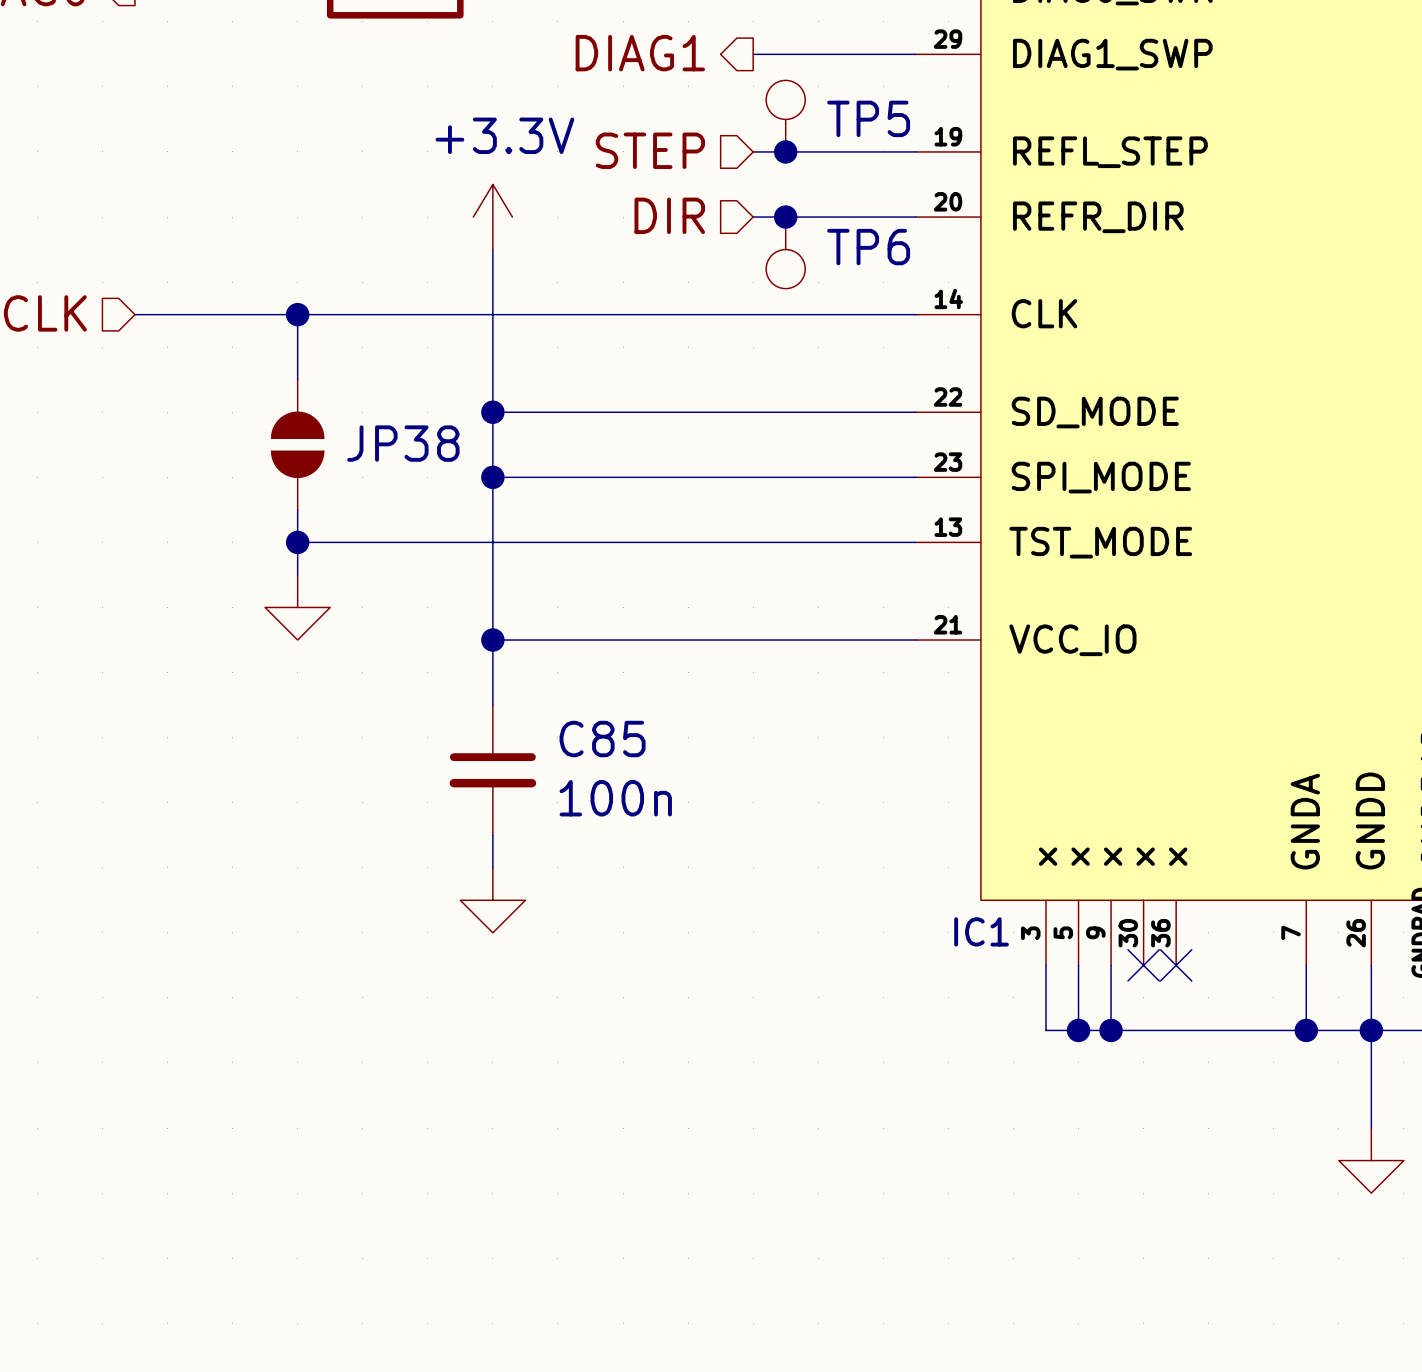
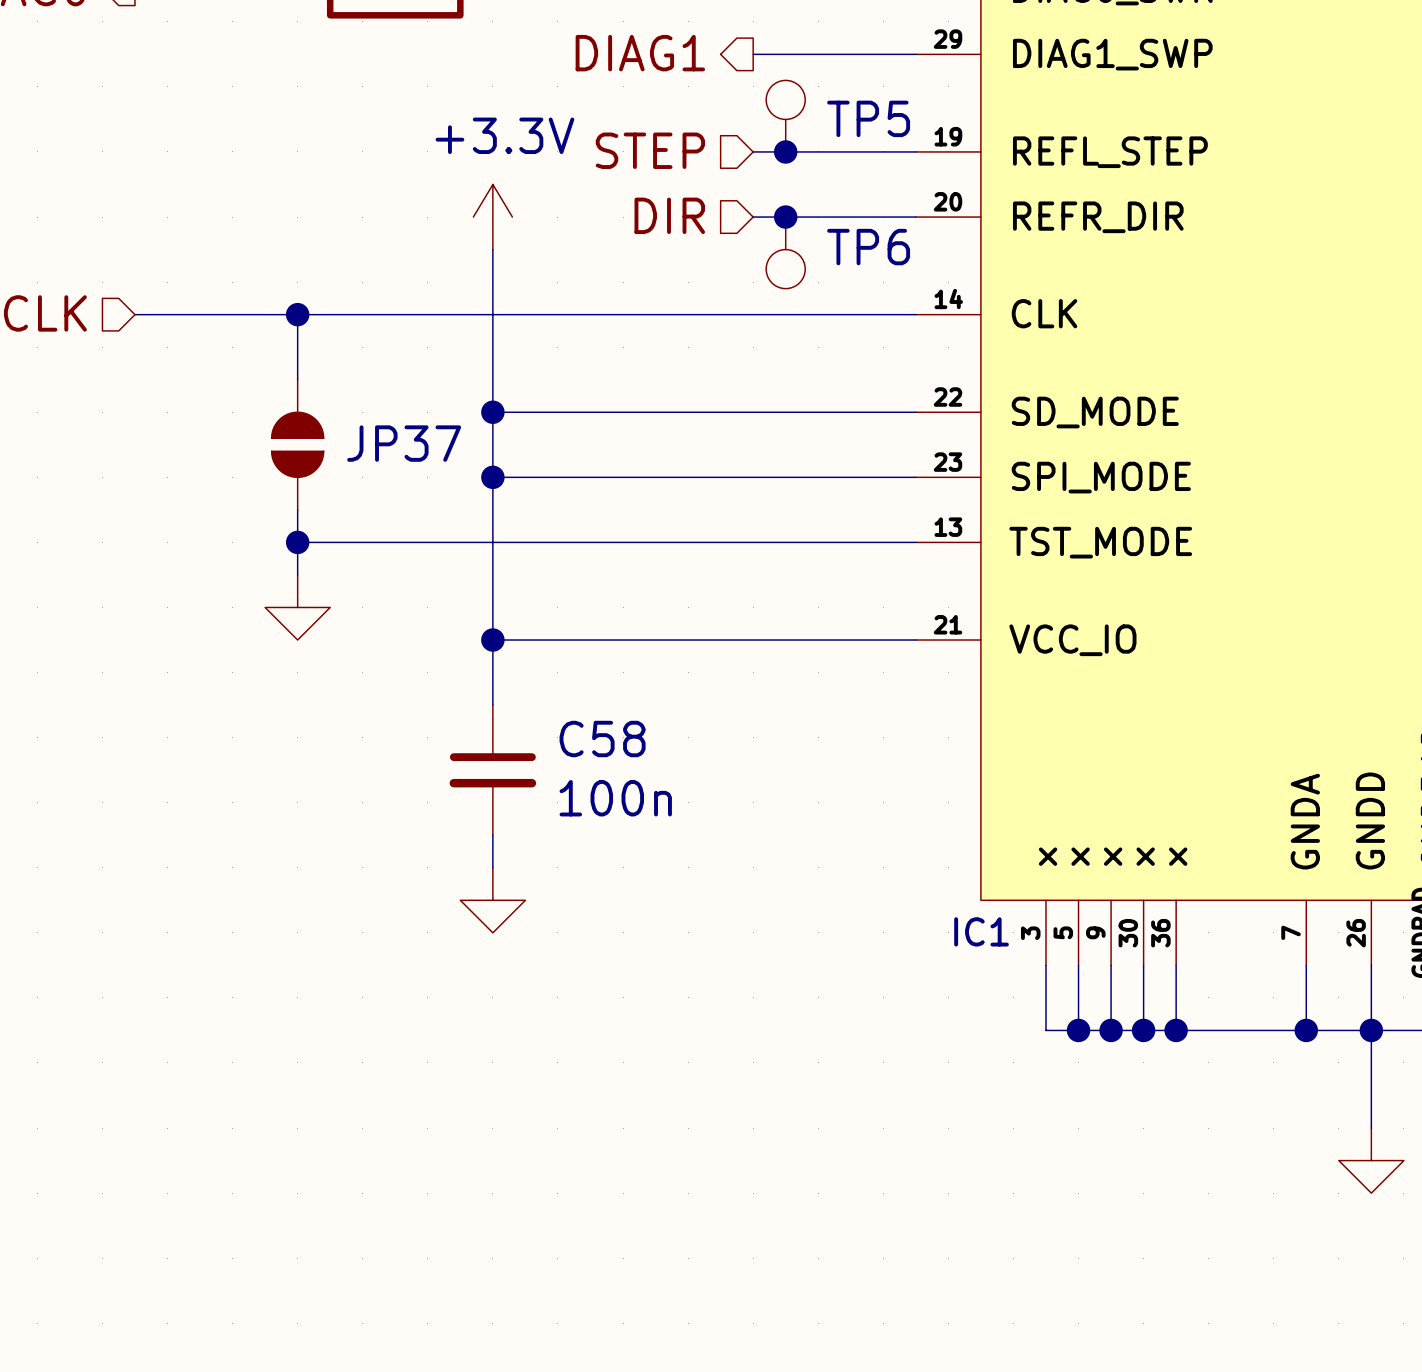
JP38 name: JP38 (403, 443) -> JP37 (404, 443)
C85 name: C85 (602, 739) -> C58 (602, 739)
wire: none -> (1143, 965) (1143, 1030)
no-connect mark: (1143, 965) -> none
wire: none -> (1176, 965) (1176, 1030)
no-connect mark: (1176, 965) -> none
junction: none -> (1143, 1030)
junction: none -> (1176, 1030)

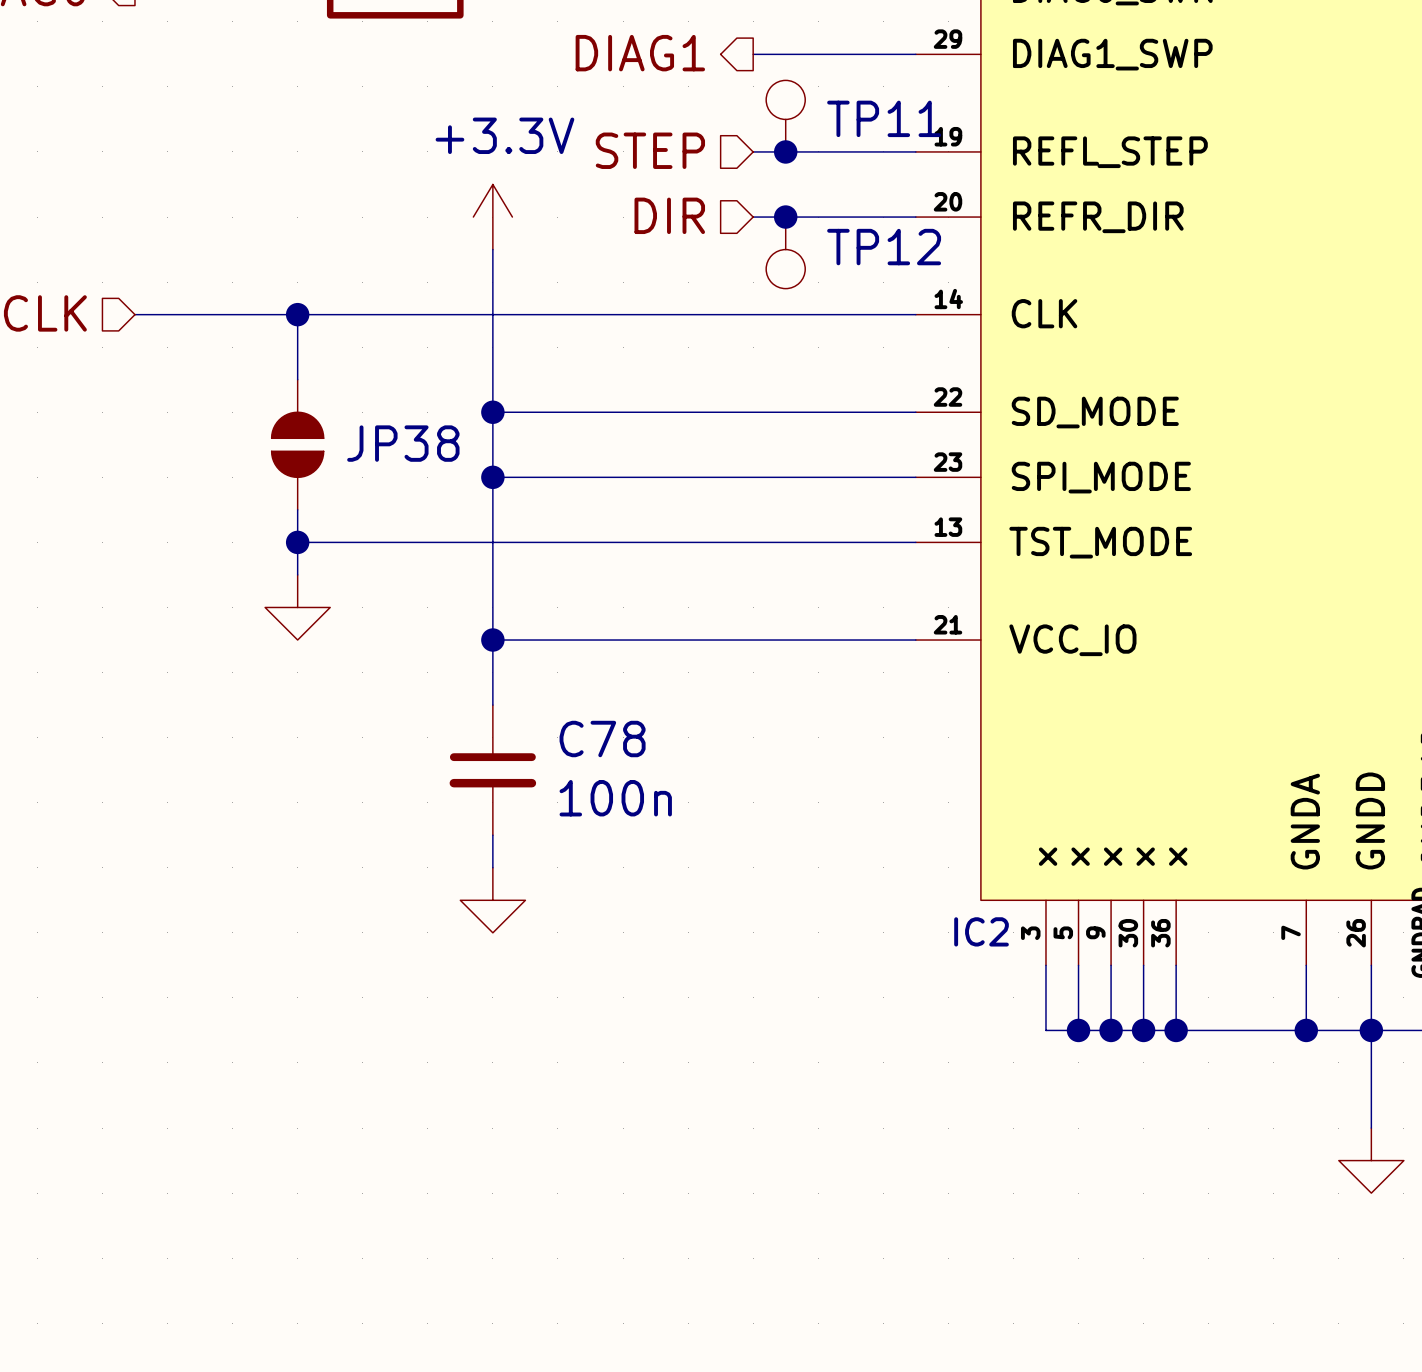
TP5 name: TP5 (868, 118) -> TP11 (884, 118)
TP6 name: TP6 (868, 247) -> TP12 (884, 247)
JP37 name: JP37 (404, 443) -> JP38 (403, 443)
C58 name: C58 (602, 739) -> C78 (602, 739)
IC1 name: IC1 (981, 931) -> IC2 (981, 931)

